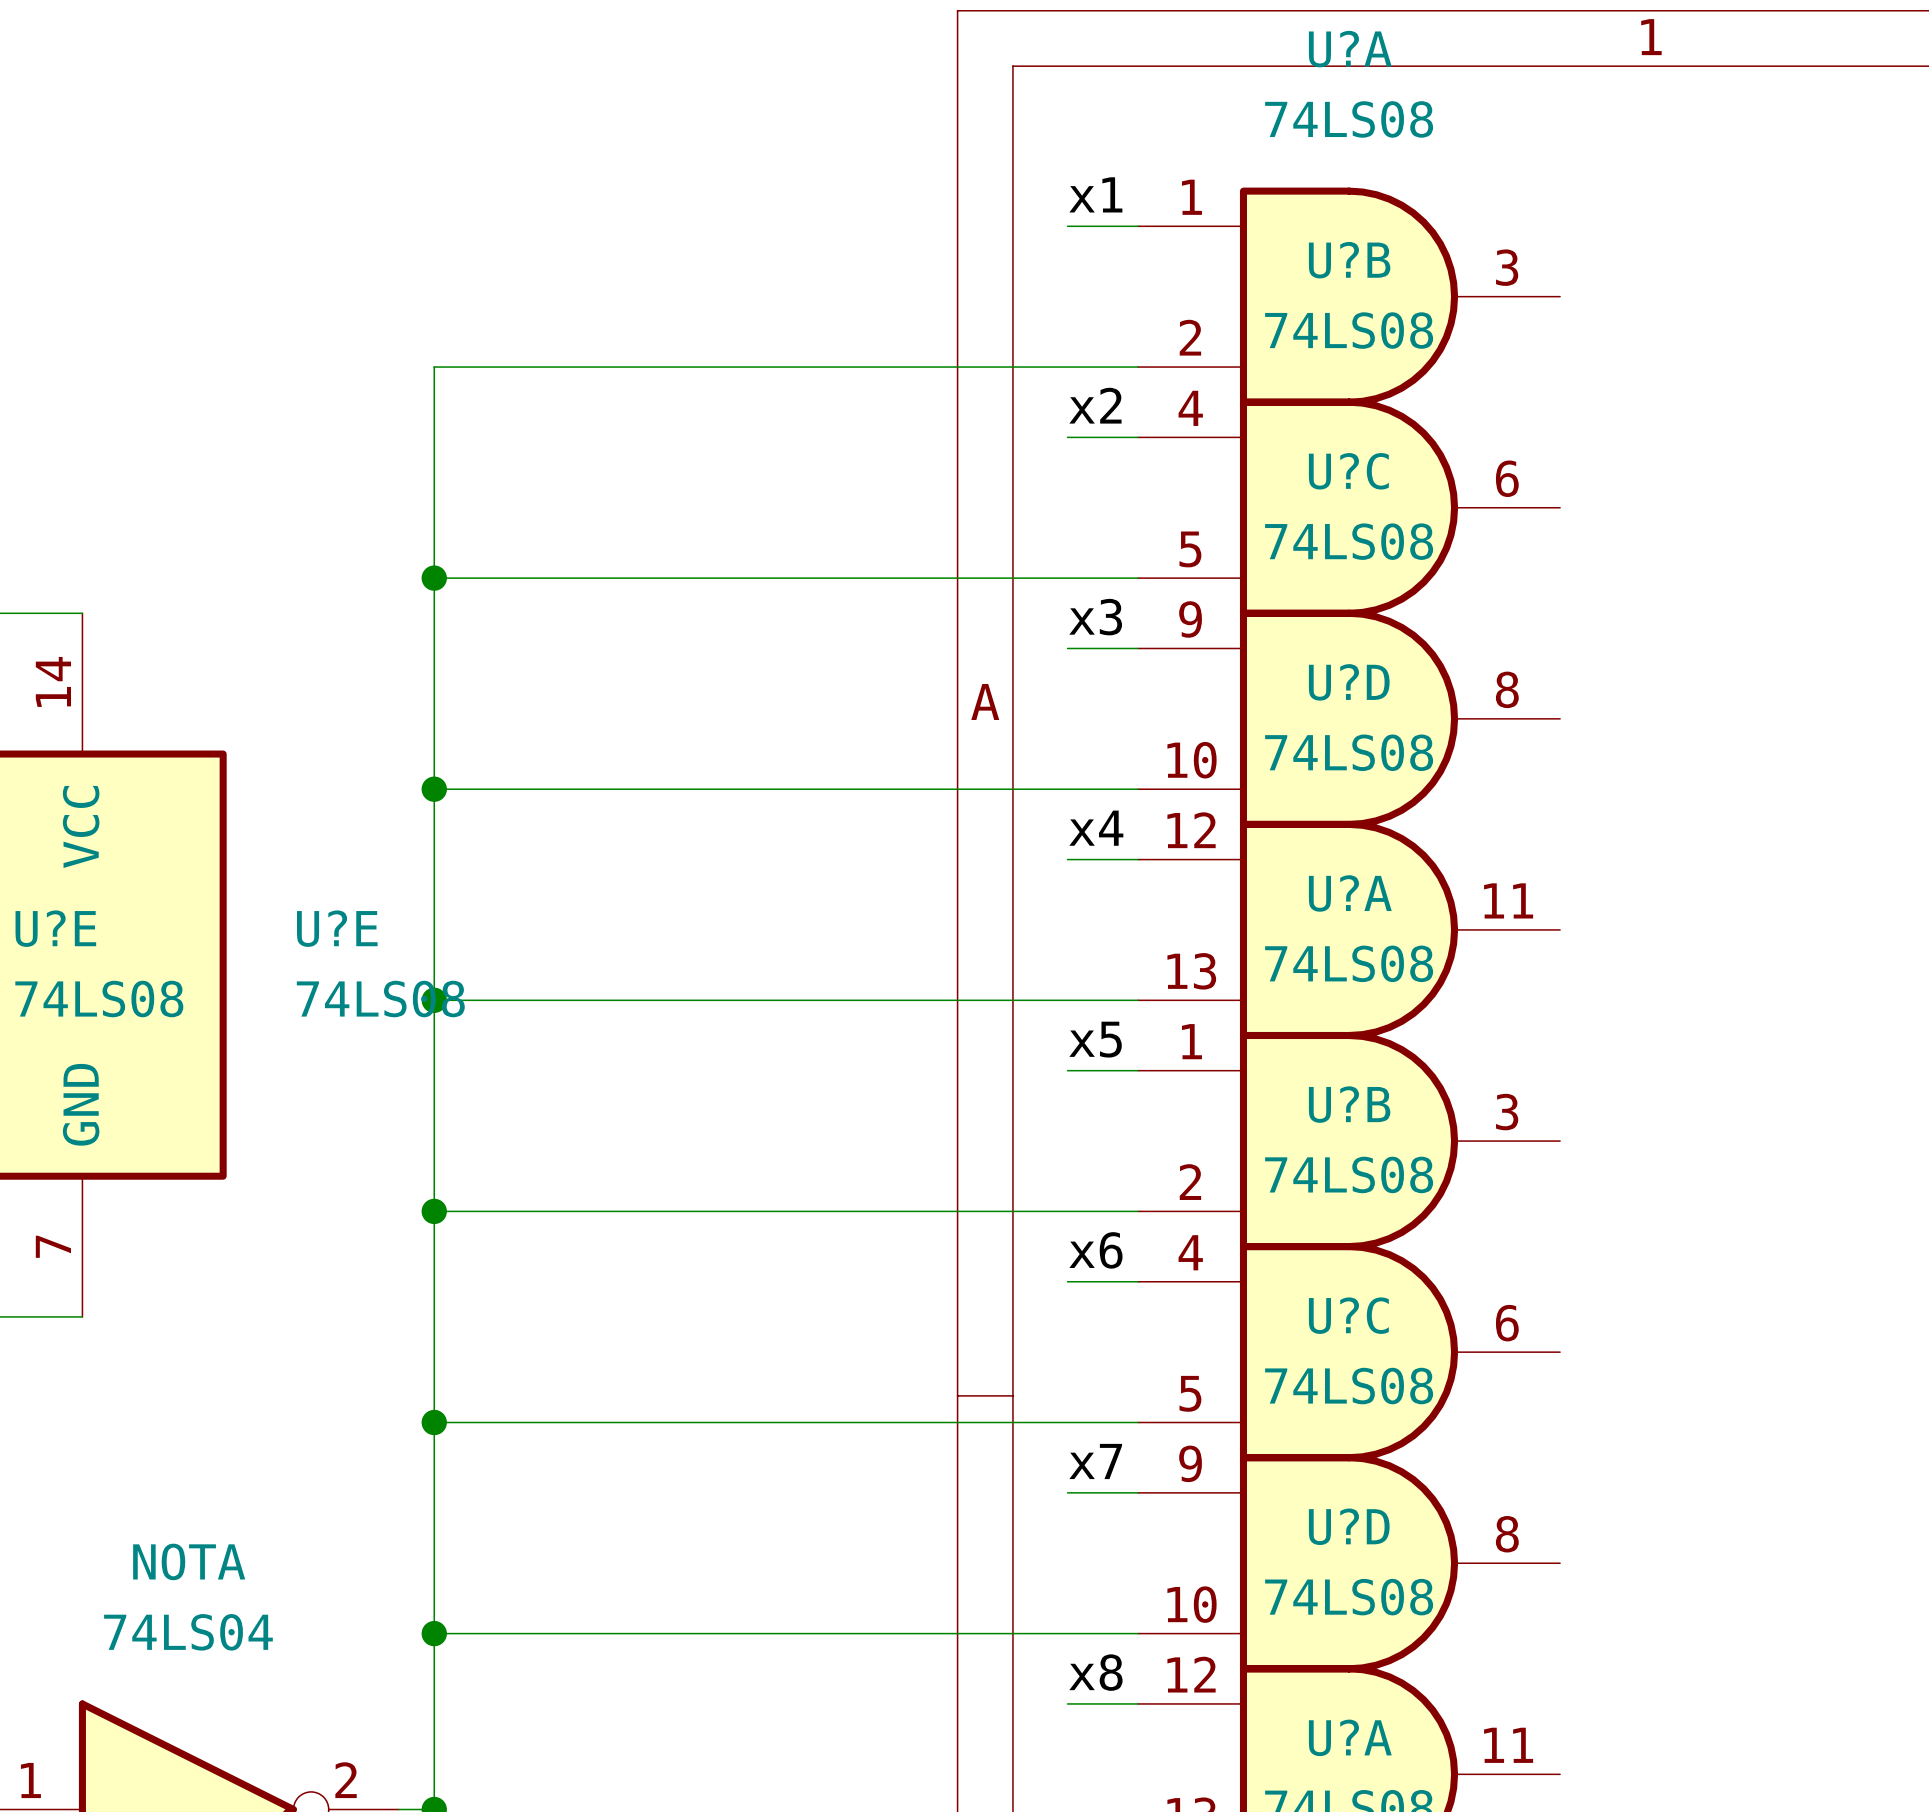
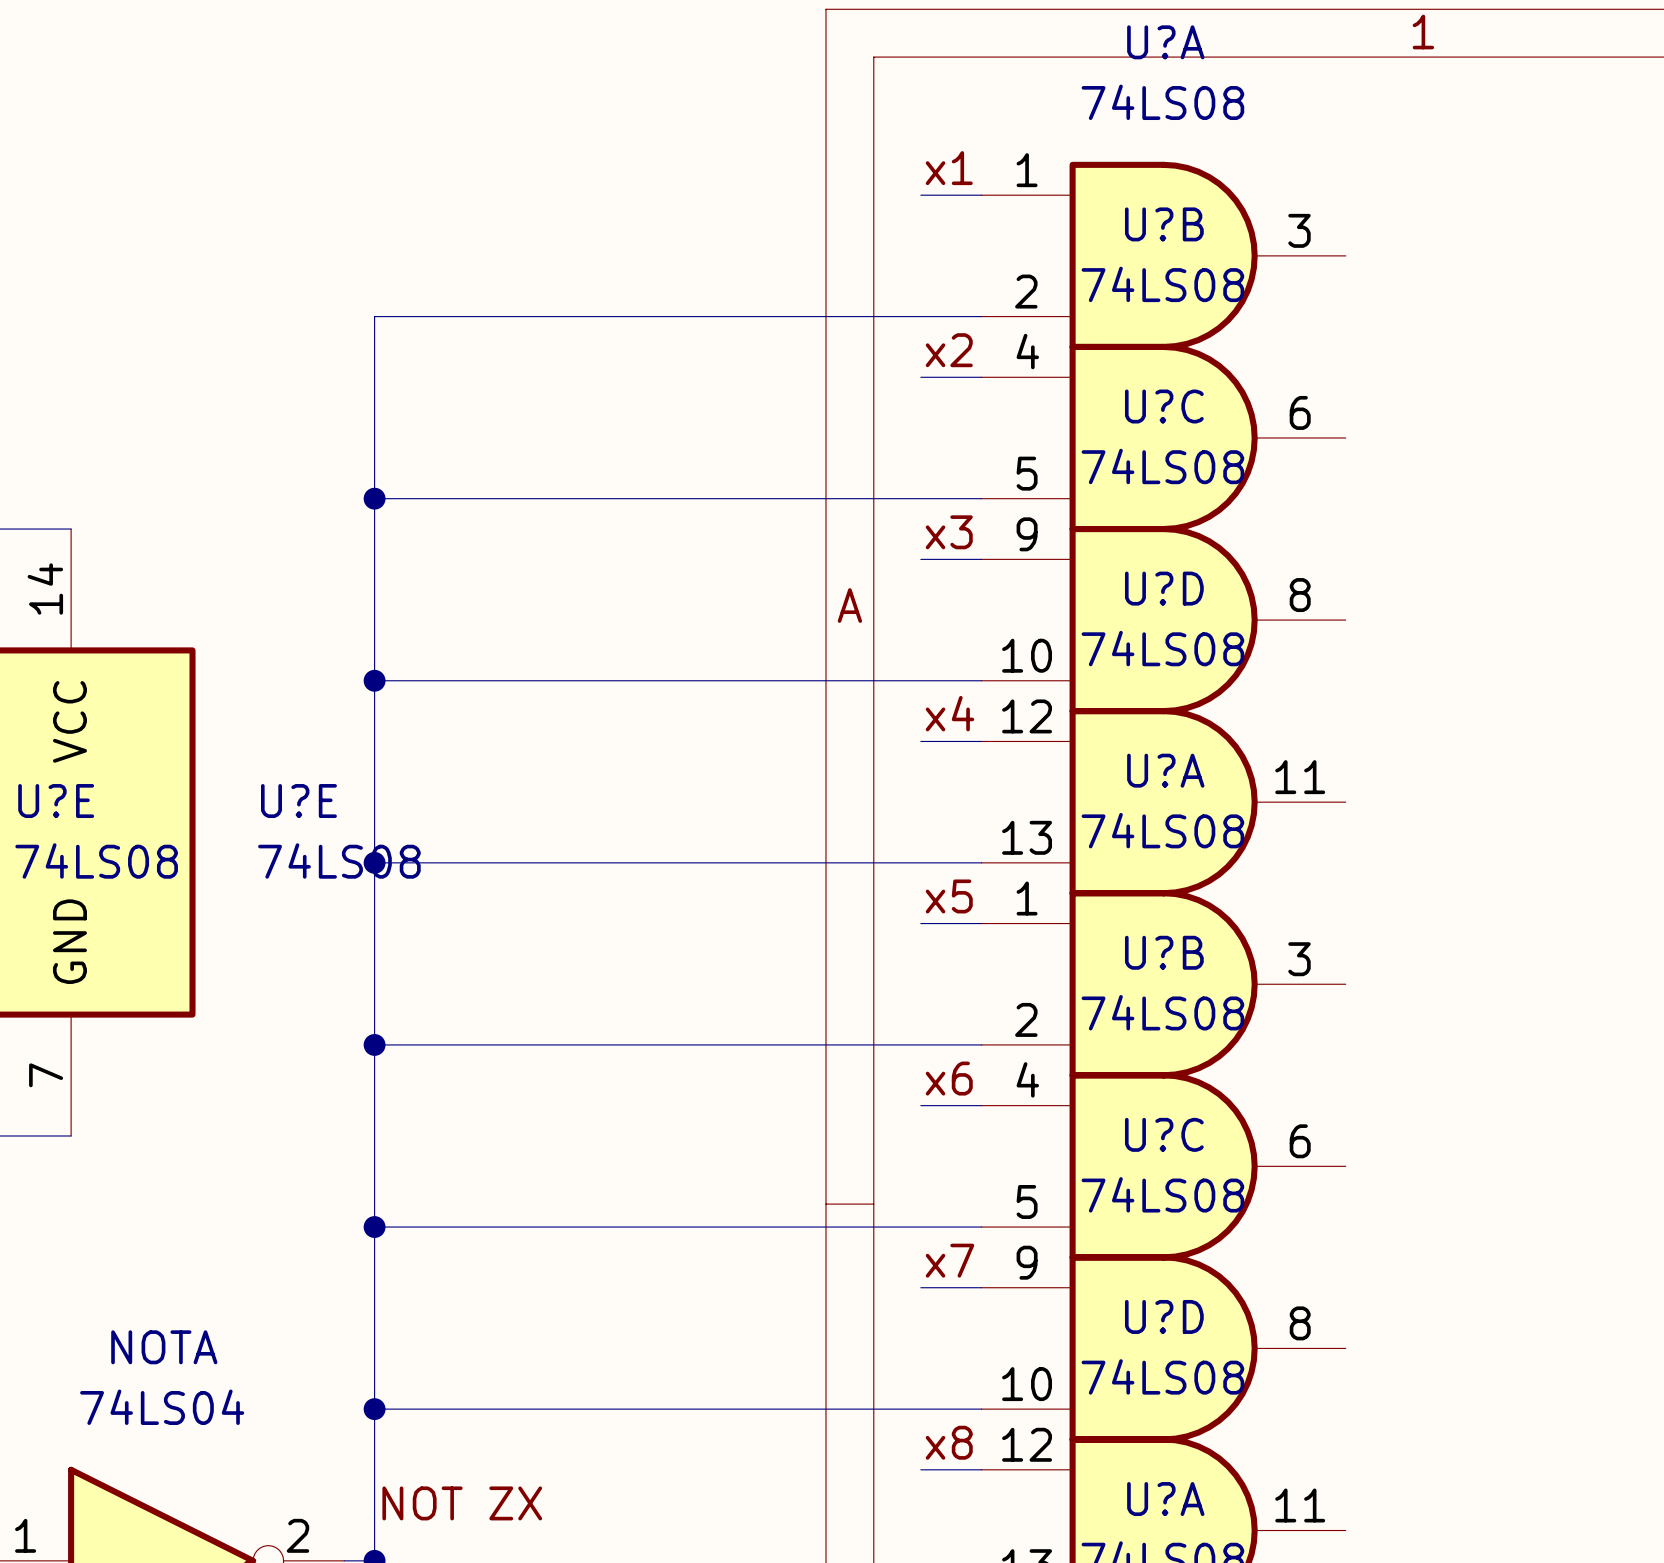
label: none -> NOT ZX (462, 1503)

